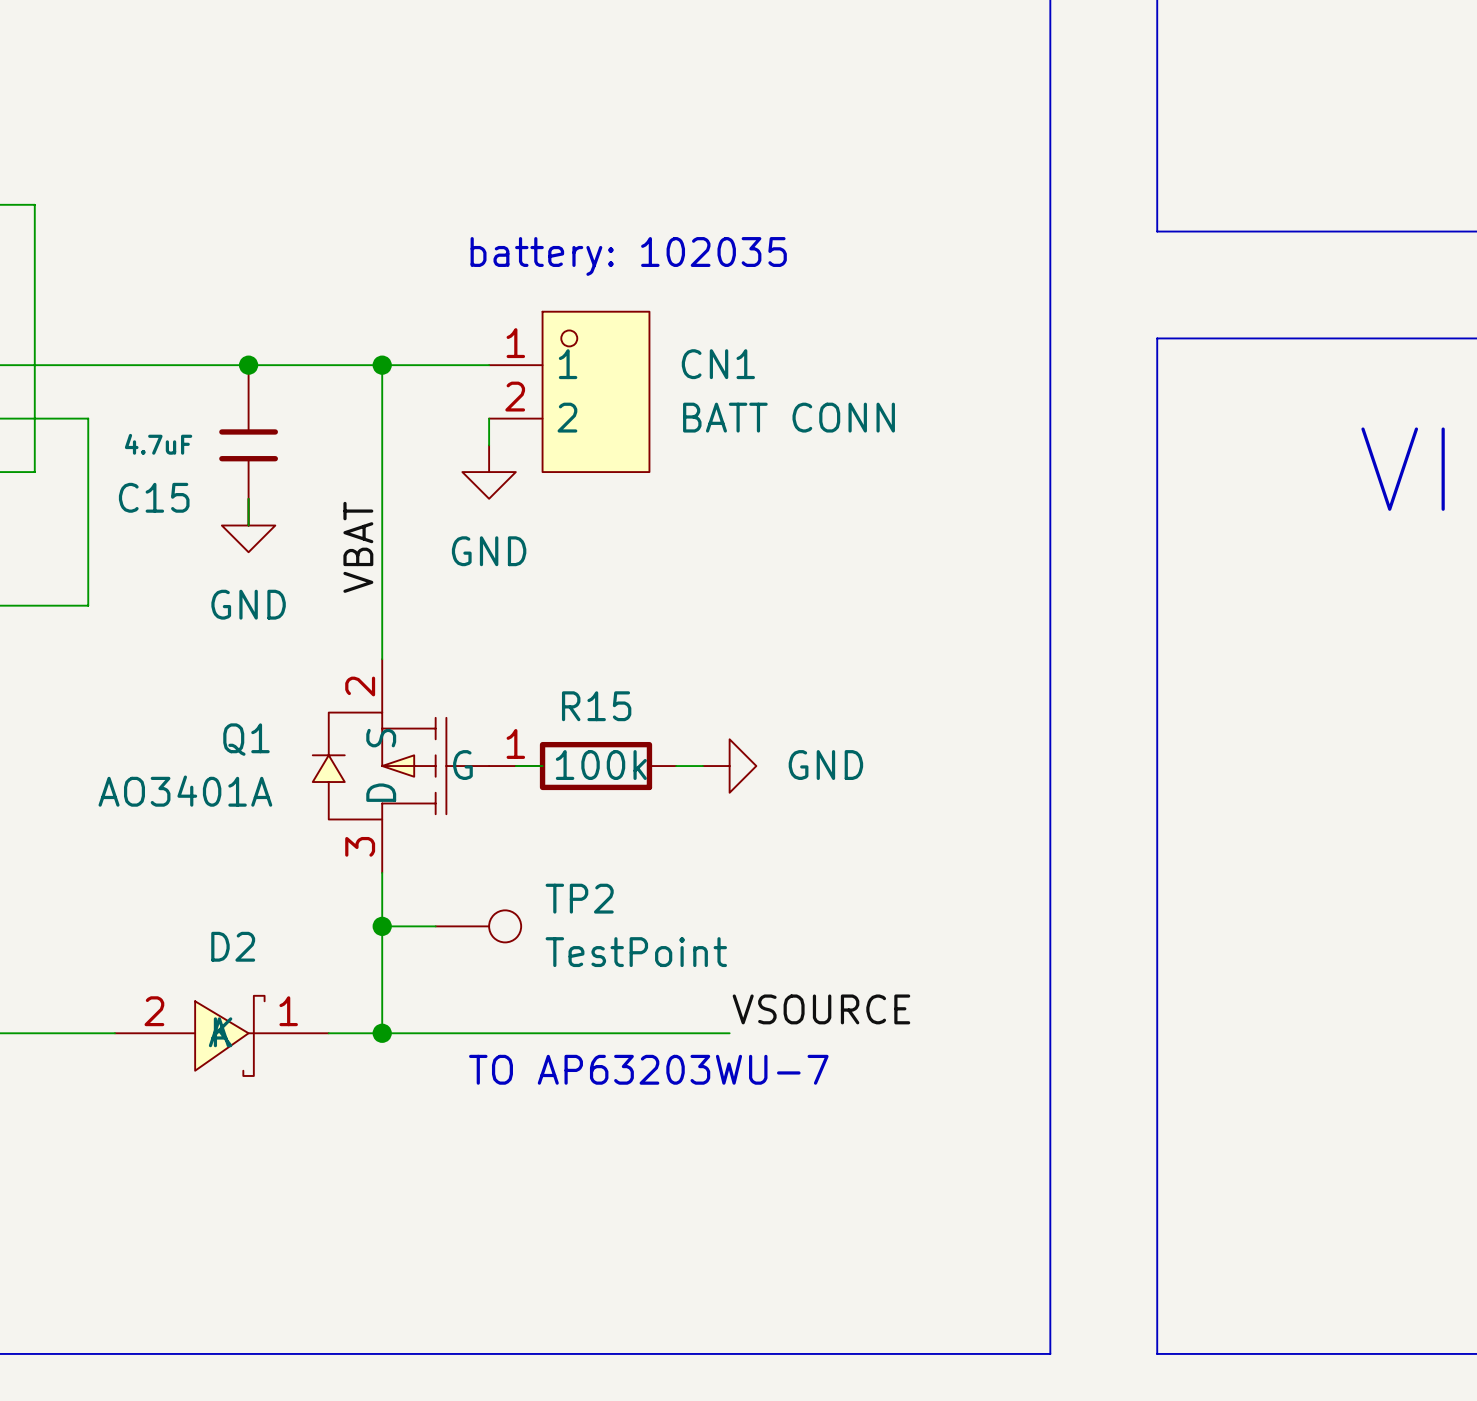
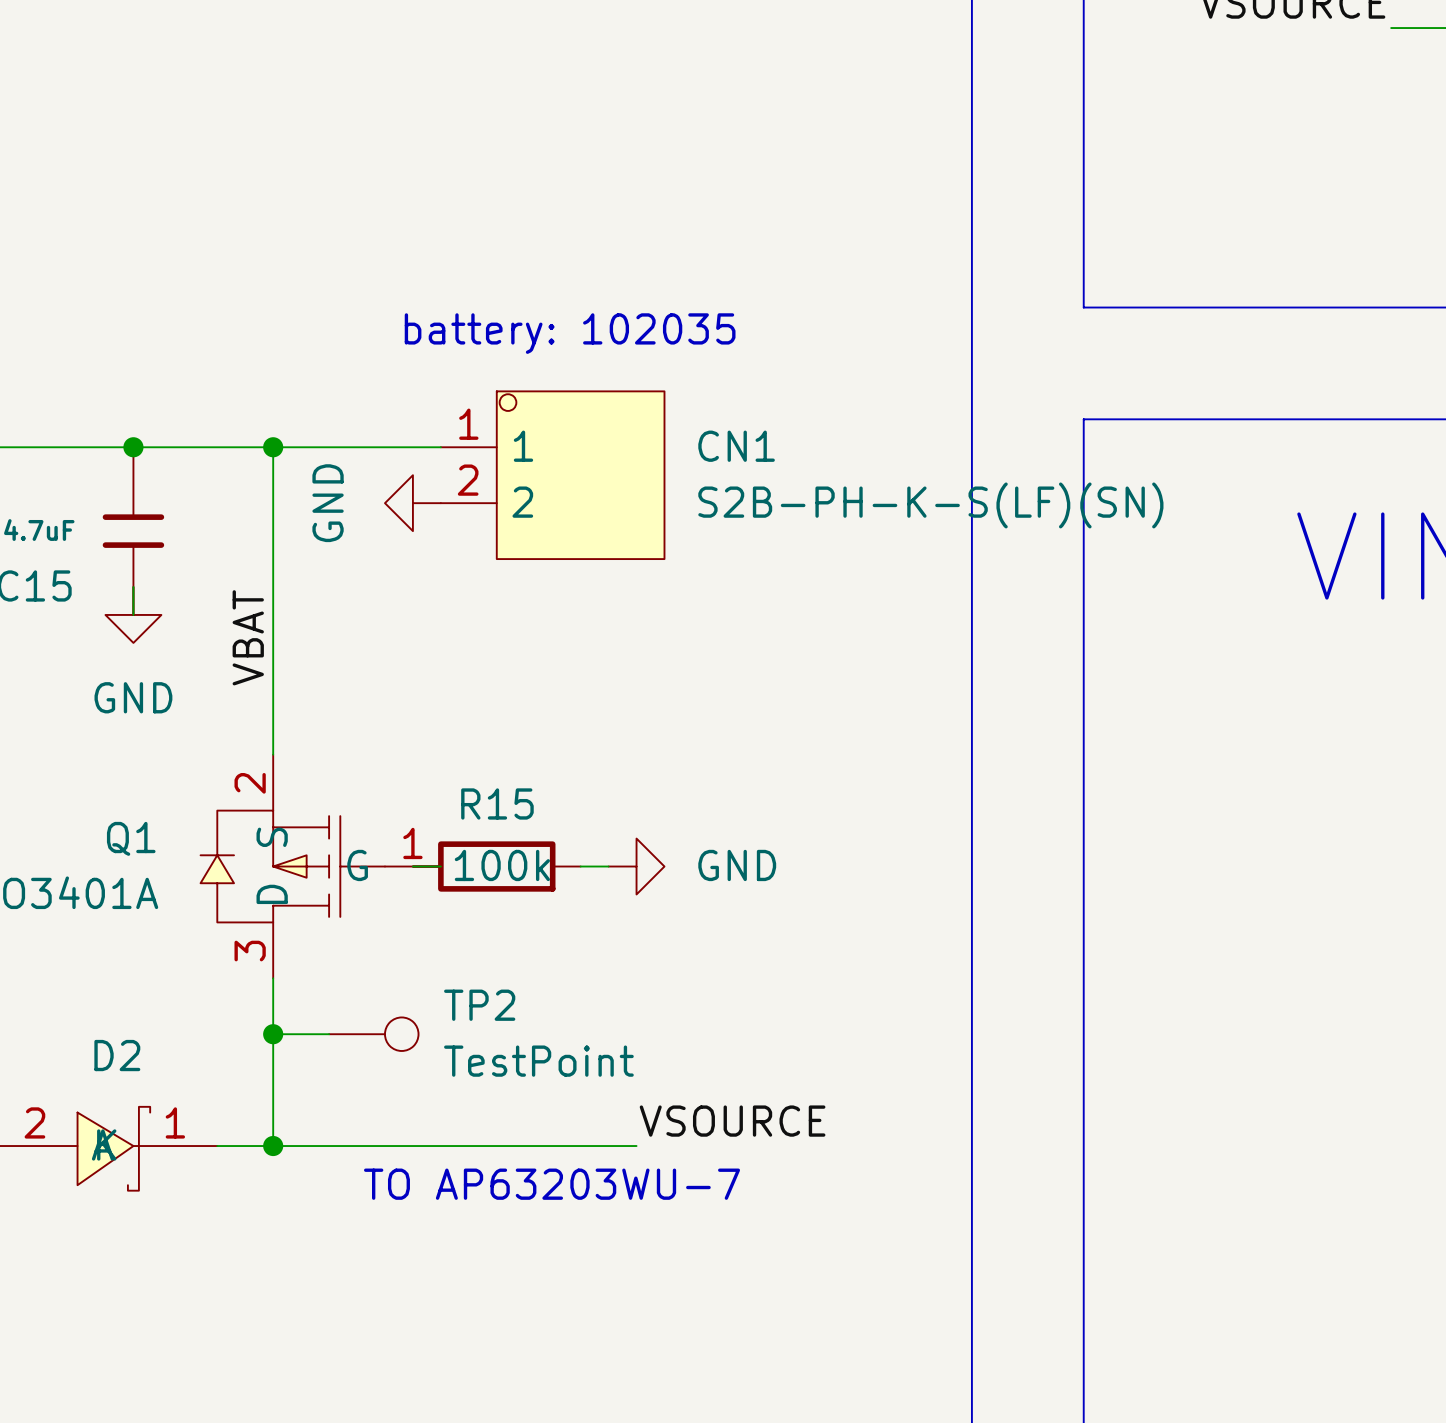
text position: battery: 102035 (628, 256) -> battery: 102035 (570, 333)
CN1 symbol: [489, 311, 650, 473] -> [440, 391, 665, 560]
CN1 value: BATT CONN (789, 417) -> S2B-PH-K-S(LF)(SN) (930, 505)
wire: (489, 418) (489, 445) -> none
power symbol rotation: 0° (489, 472) -> 90° clockwise (412, 503)
power symbol position: GND (489, 472) -> GND (412, 503)

